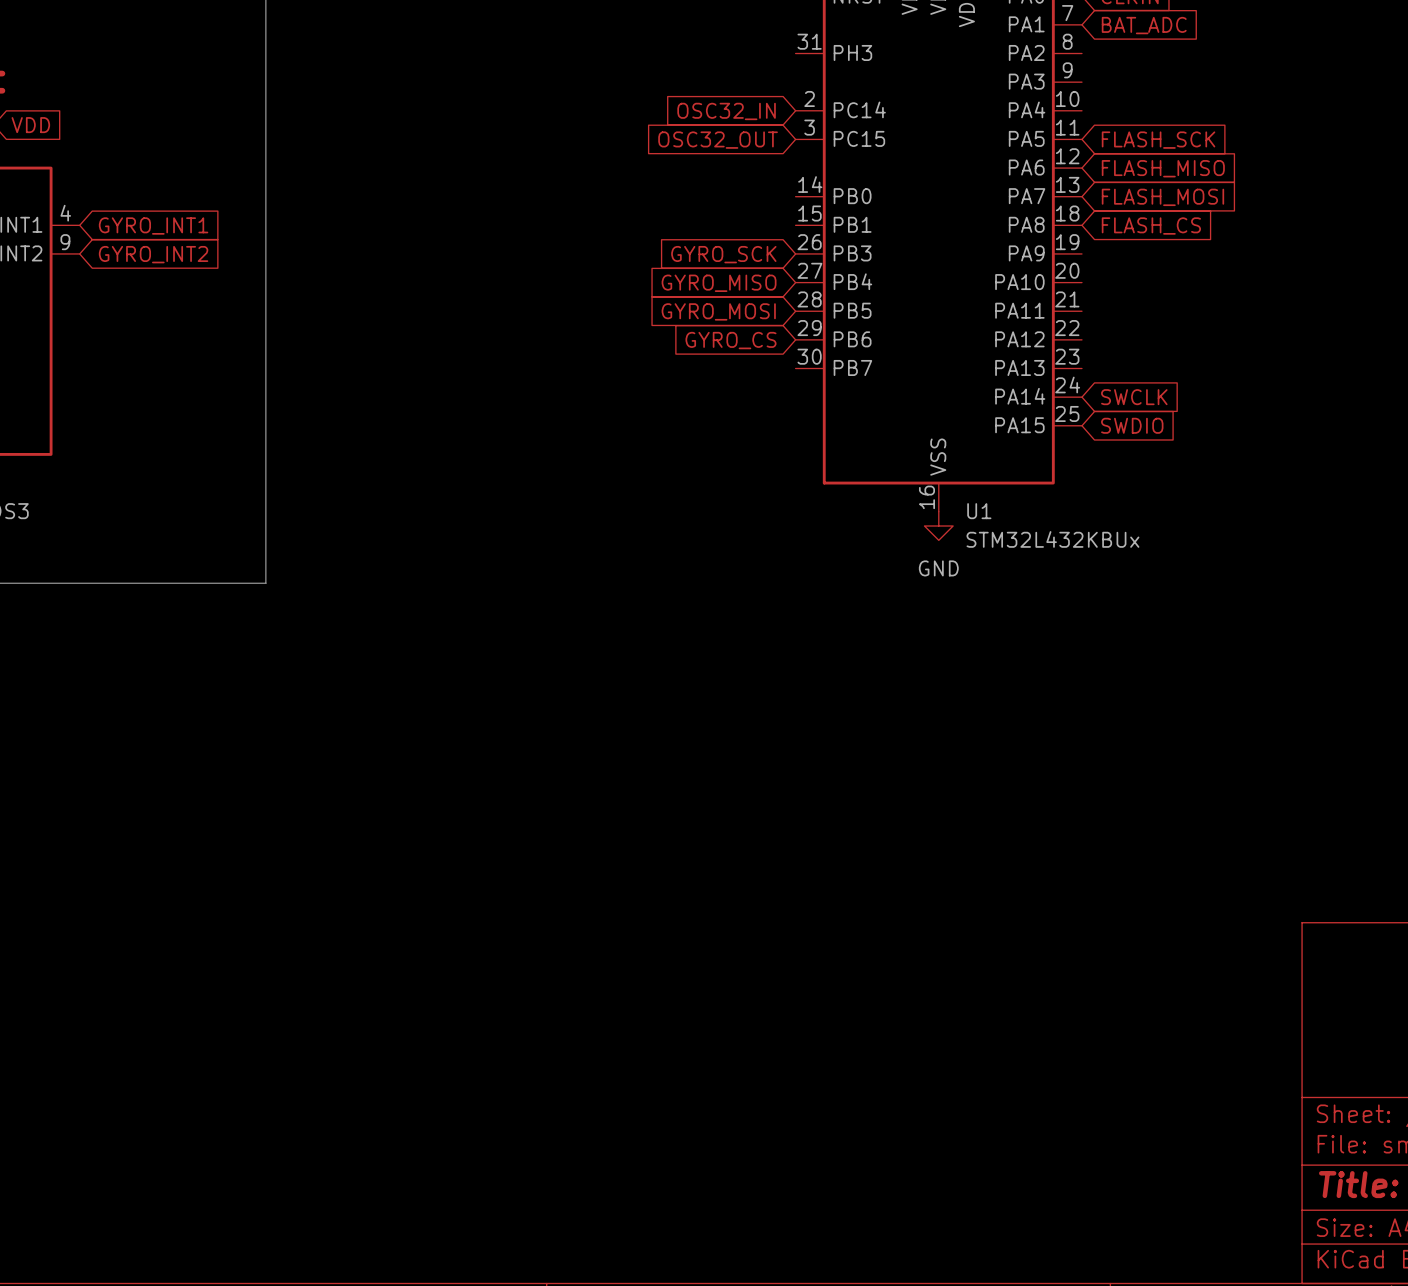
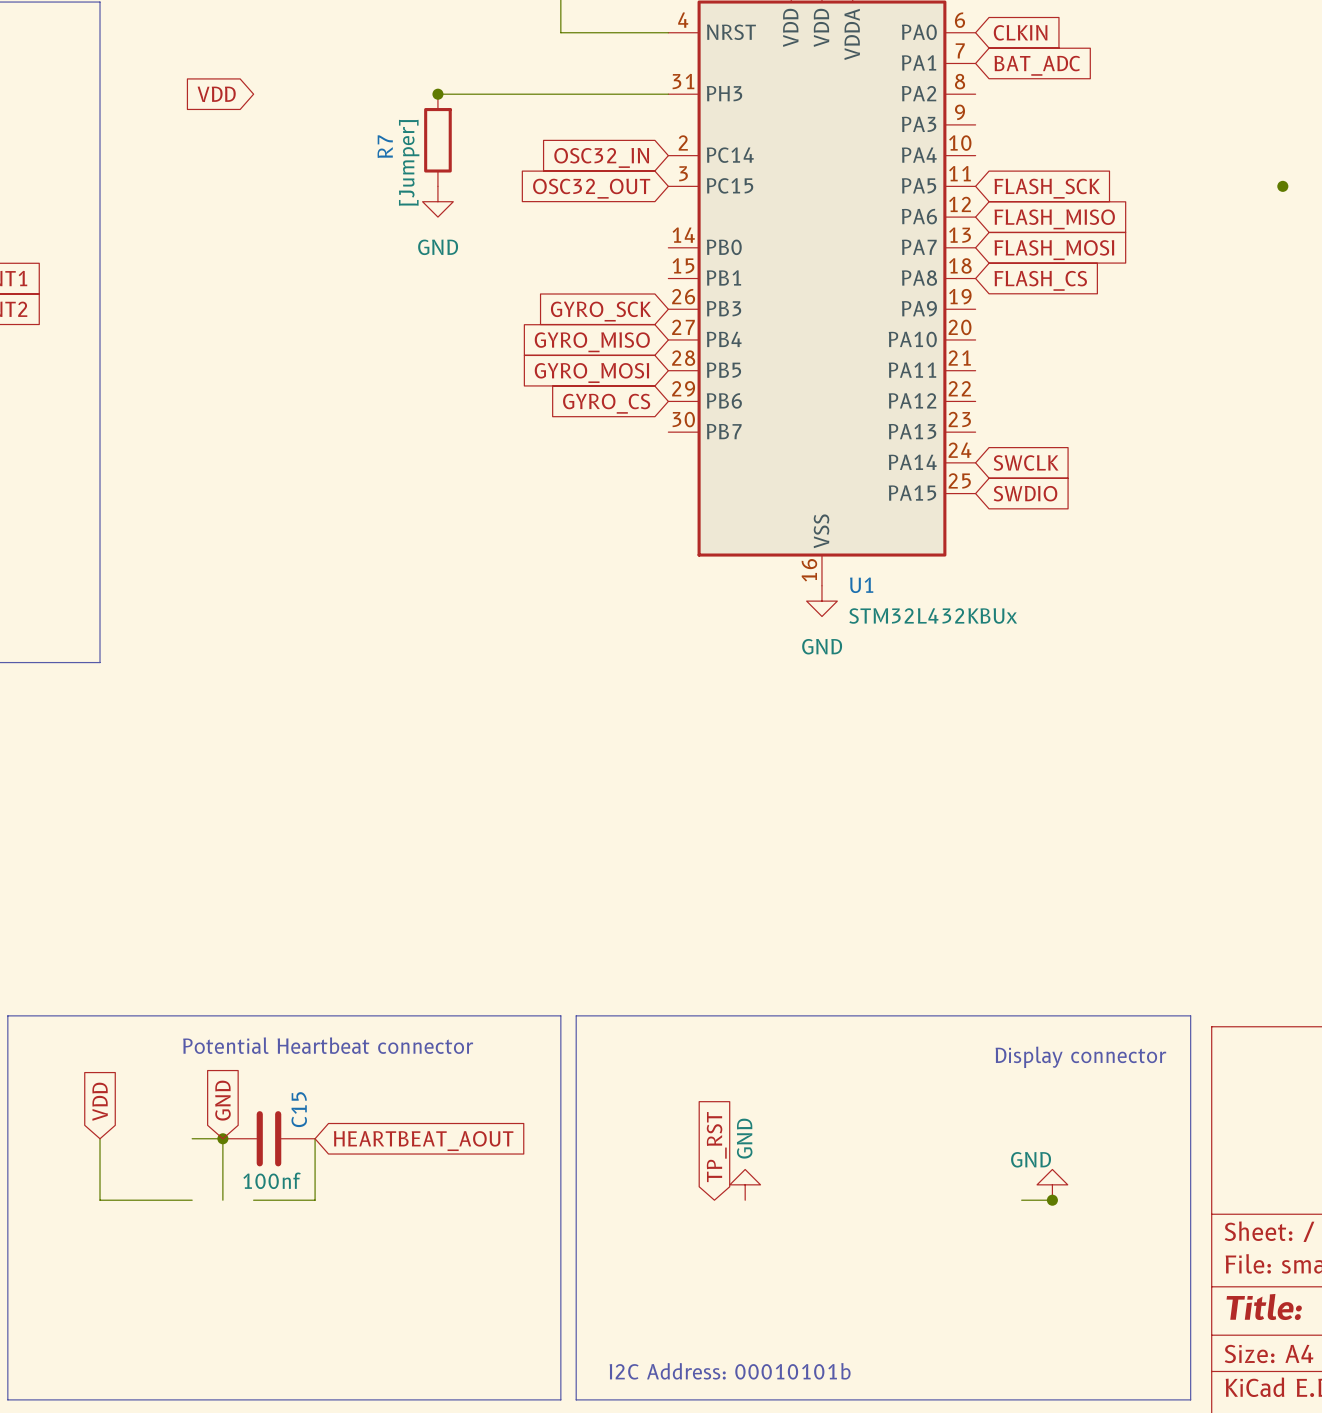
global label: none -> VDD (216, 94)
wire: none -> (437, 94) (668, 94)
junction: none -> (437, 94)
R7: none -> [Jumper] (437, 140)
junction: none -> (1282, 186)
power symbol: none -> GND (437, 201)
line: none -> (7, 1015) (560, 1015) (560, 1399) (7, 1399) (7, 1015)
line: none -> (576, 1015) (1190, 1015) (1190, 1399) (576, 1399) (576, 1015)
text: none -> Potential Heartbeat connector (328, 1045)
text: none -> Display connector (1080, 1057)
global label: none -> GND (222, 1100)
global label: none -> VDD (100, 1101)
wire: none -> (100, 1138) (100, 1200) (192, 1200)
wire: none -> (192, 1138) (222, 1138) (222, 1200)
junction: none -> (222, 1138)
C15: none -> 100nf (268, 1138)
wire: none -> (315, 1138) (315, 1200) (253, 1200)
global label: none -> HEARTBEAT_AOUT (423, 1141)
global label: none -> TP_RST (716, 1147)
power symbol: none -> GND (745, 1184)
power symbol: none -> GND (1052, 1184)
wire: none -> (1021, 1200) (1052, 1200)
junction: none -> (1052, 1200)
text: none -> I2C Address: 00010101b (730, 1371)

